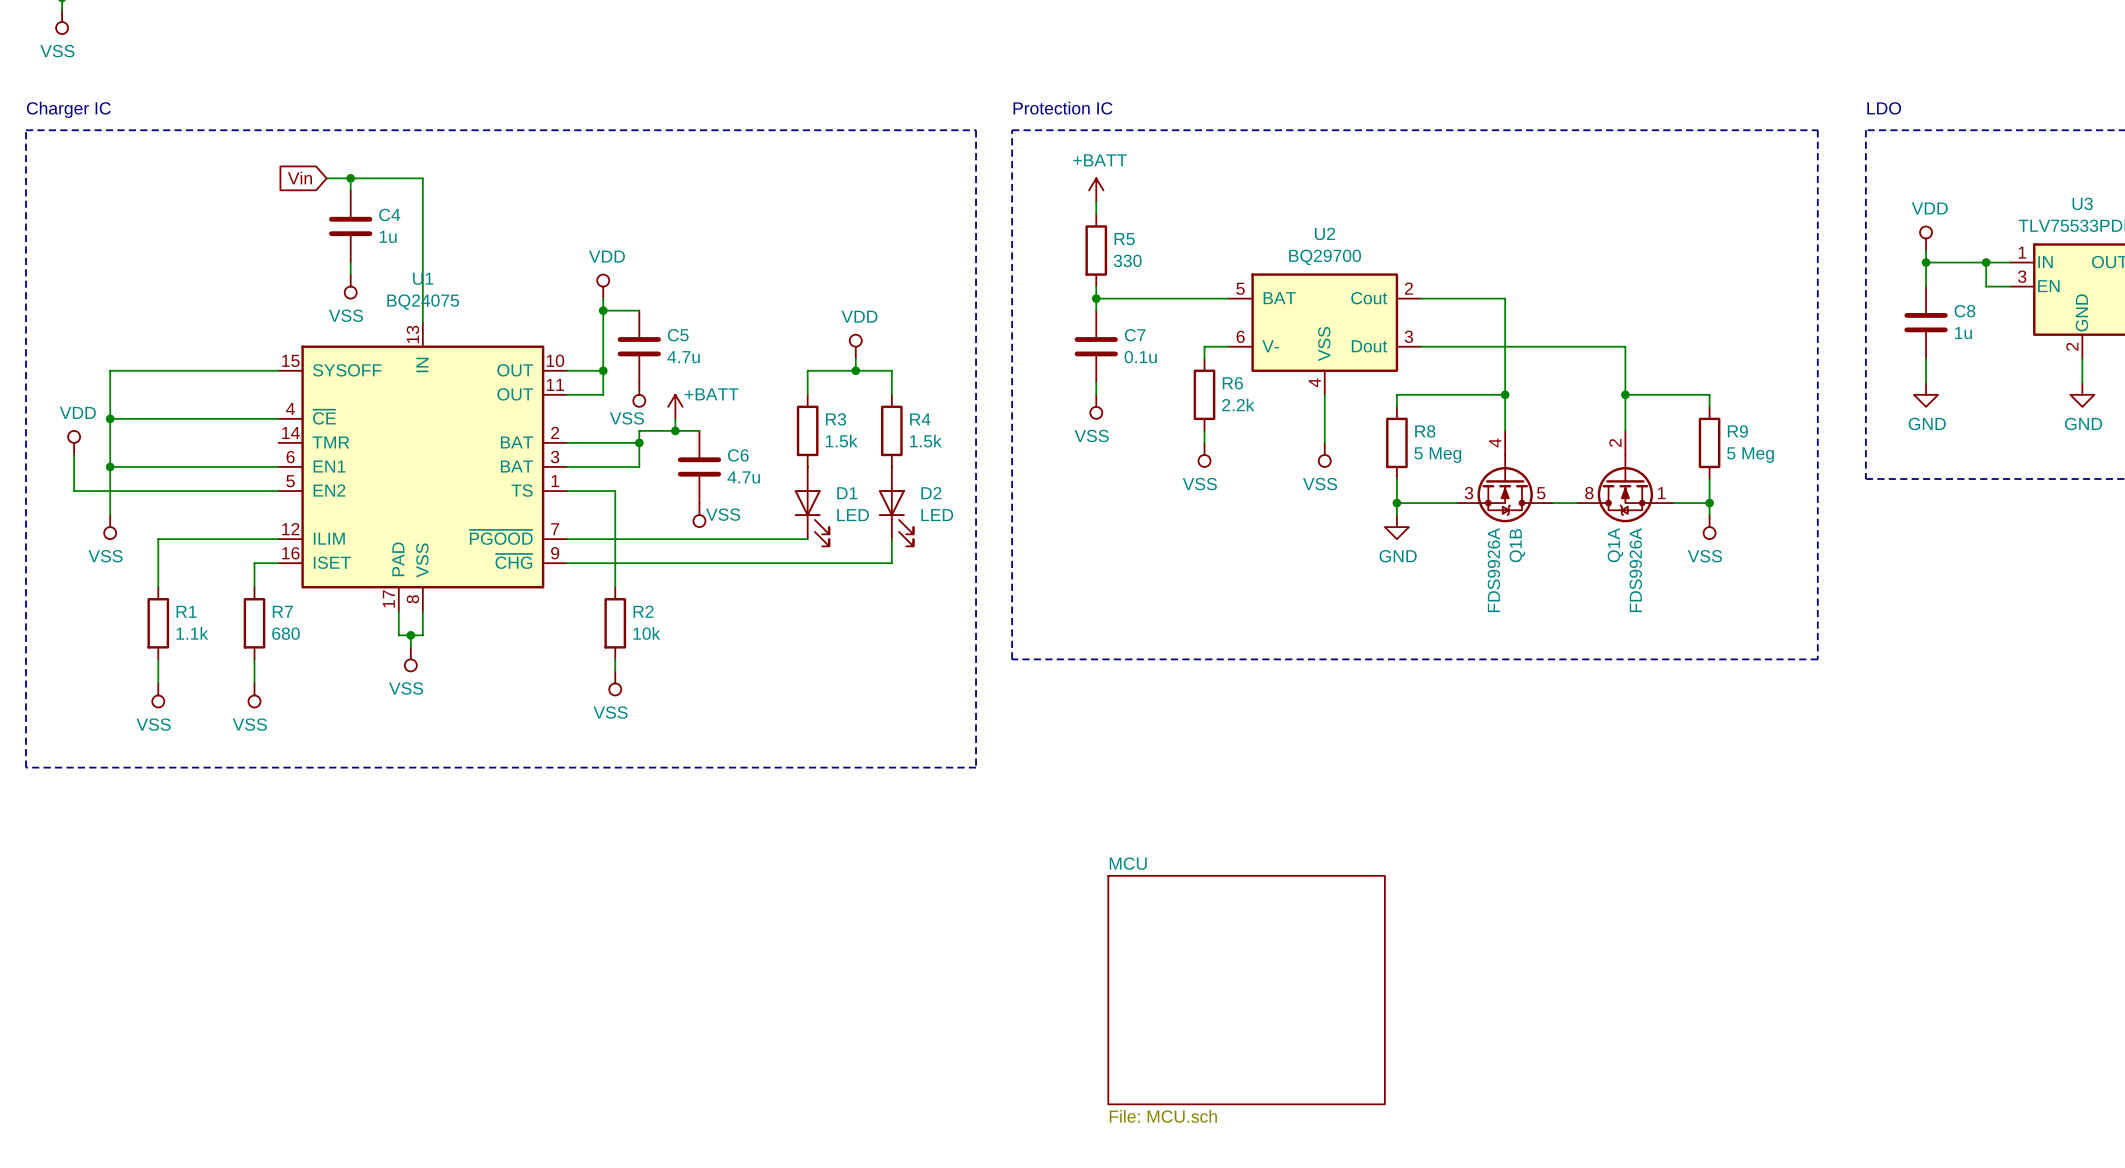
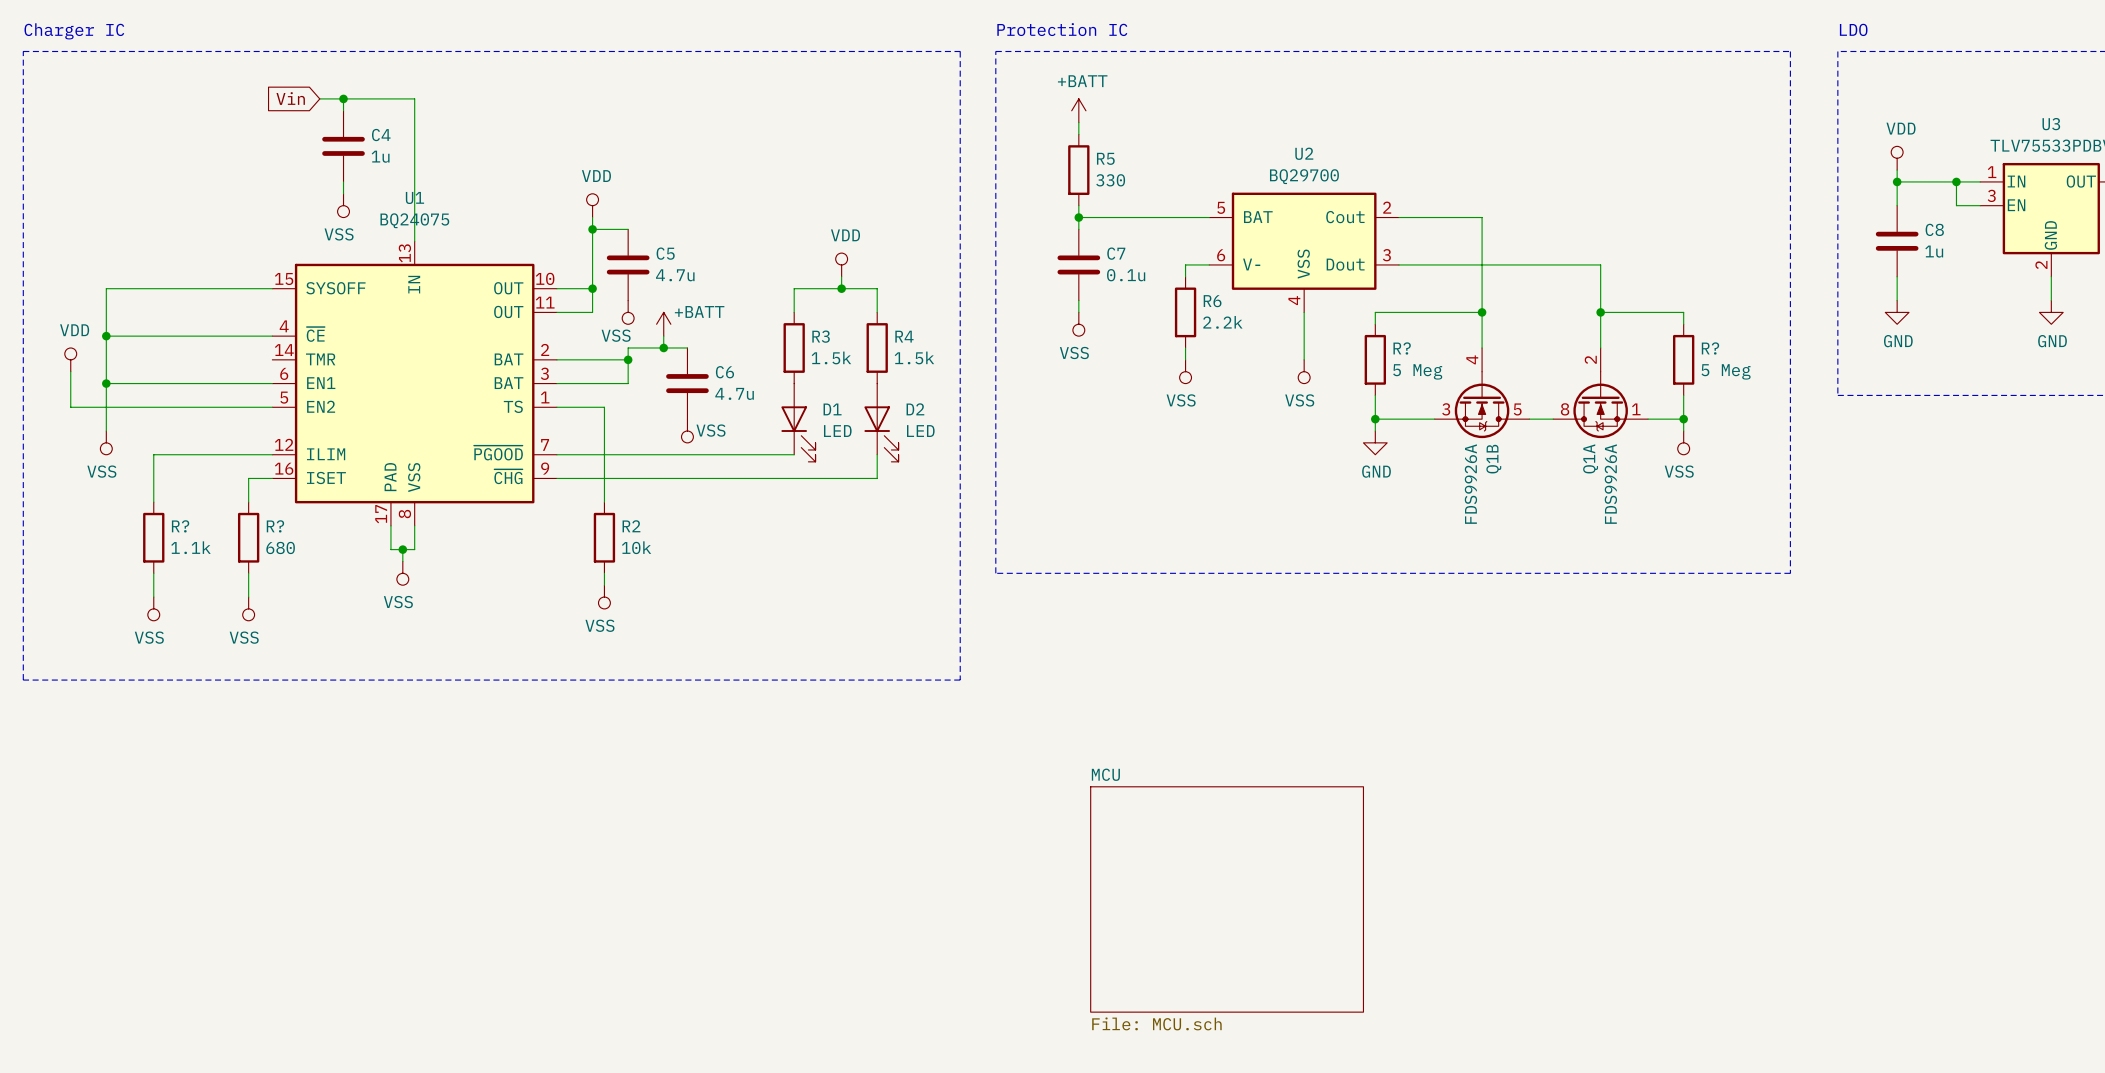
R8 name: R8 (1425, 431) -> R? (1402, 348)
R9 name: R9 (1737, 431) -> R? (1710, 348)
R1 name: R1 (186, 611) -> R? (180, 526)
R7 name: R7 (282, 611) -> R? (275, 526)

